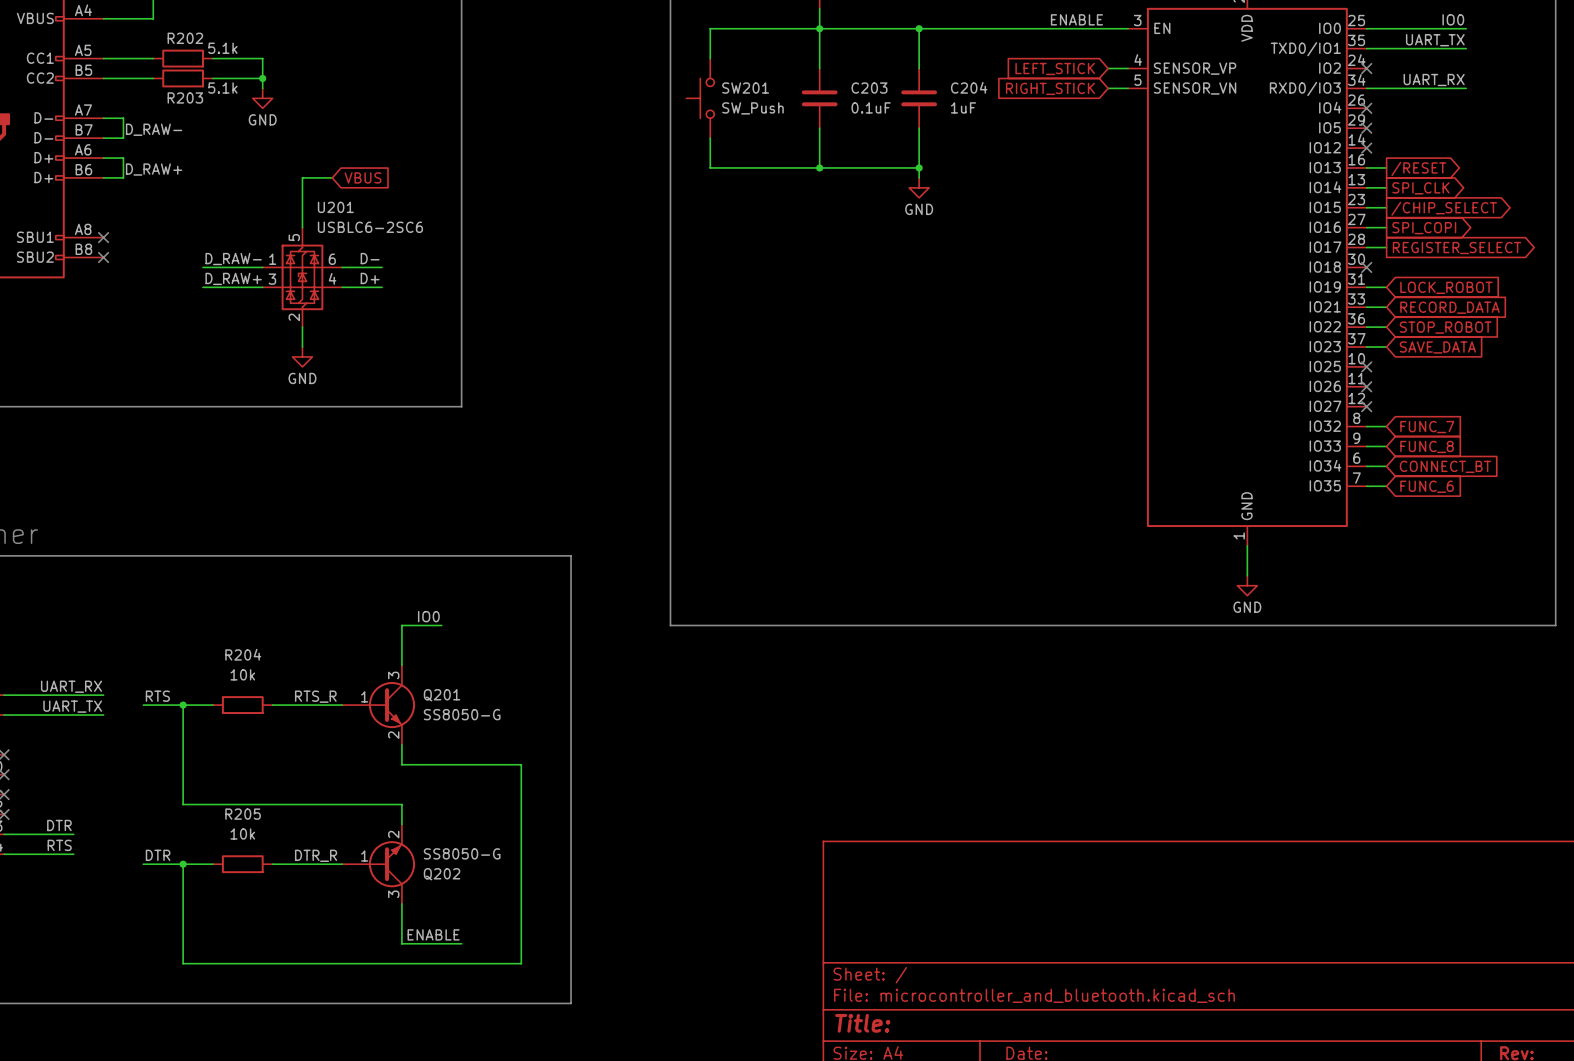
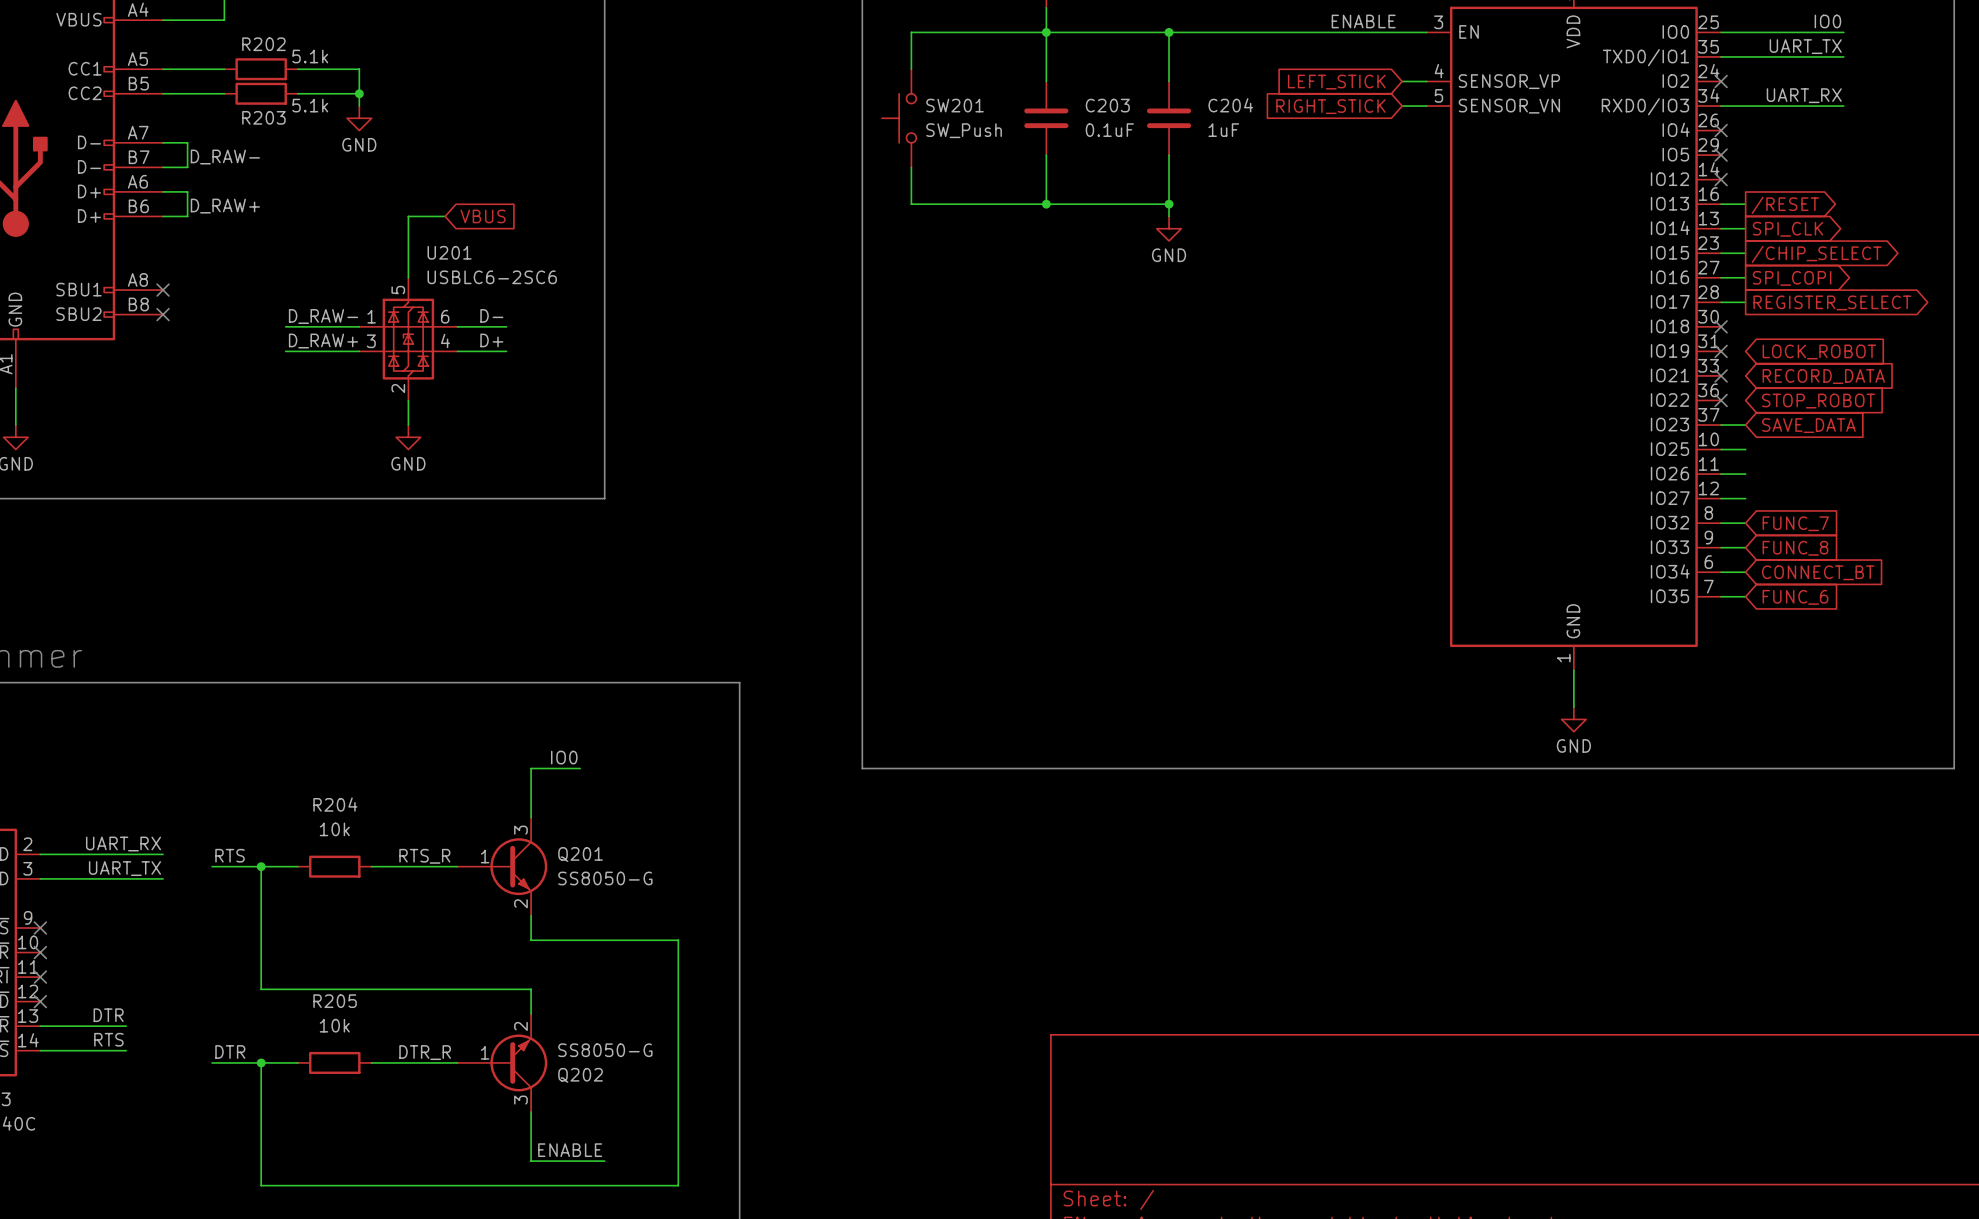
wire: (1366, 287) (1386, 287) -> (1721, 449) (1745, 449)
no-connect mark: none -> (1721, 351)
wire: (1366, 307) (1386, 307) -> (1721, 474) (1745, 474)
no-connect mark: none -> (1721, 375)
wire: (1366, 327) (1386, 327) -> (1721, 498) (1745, 498)
no-connect mark: none -> (1721, 400)
no-connect mark: (1366, 366) -> none
no-connect mark: (1366, 386) -> none
no-connect mark: (1366, 406) -> none

